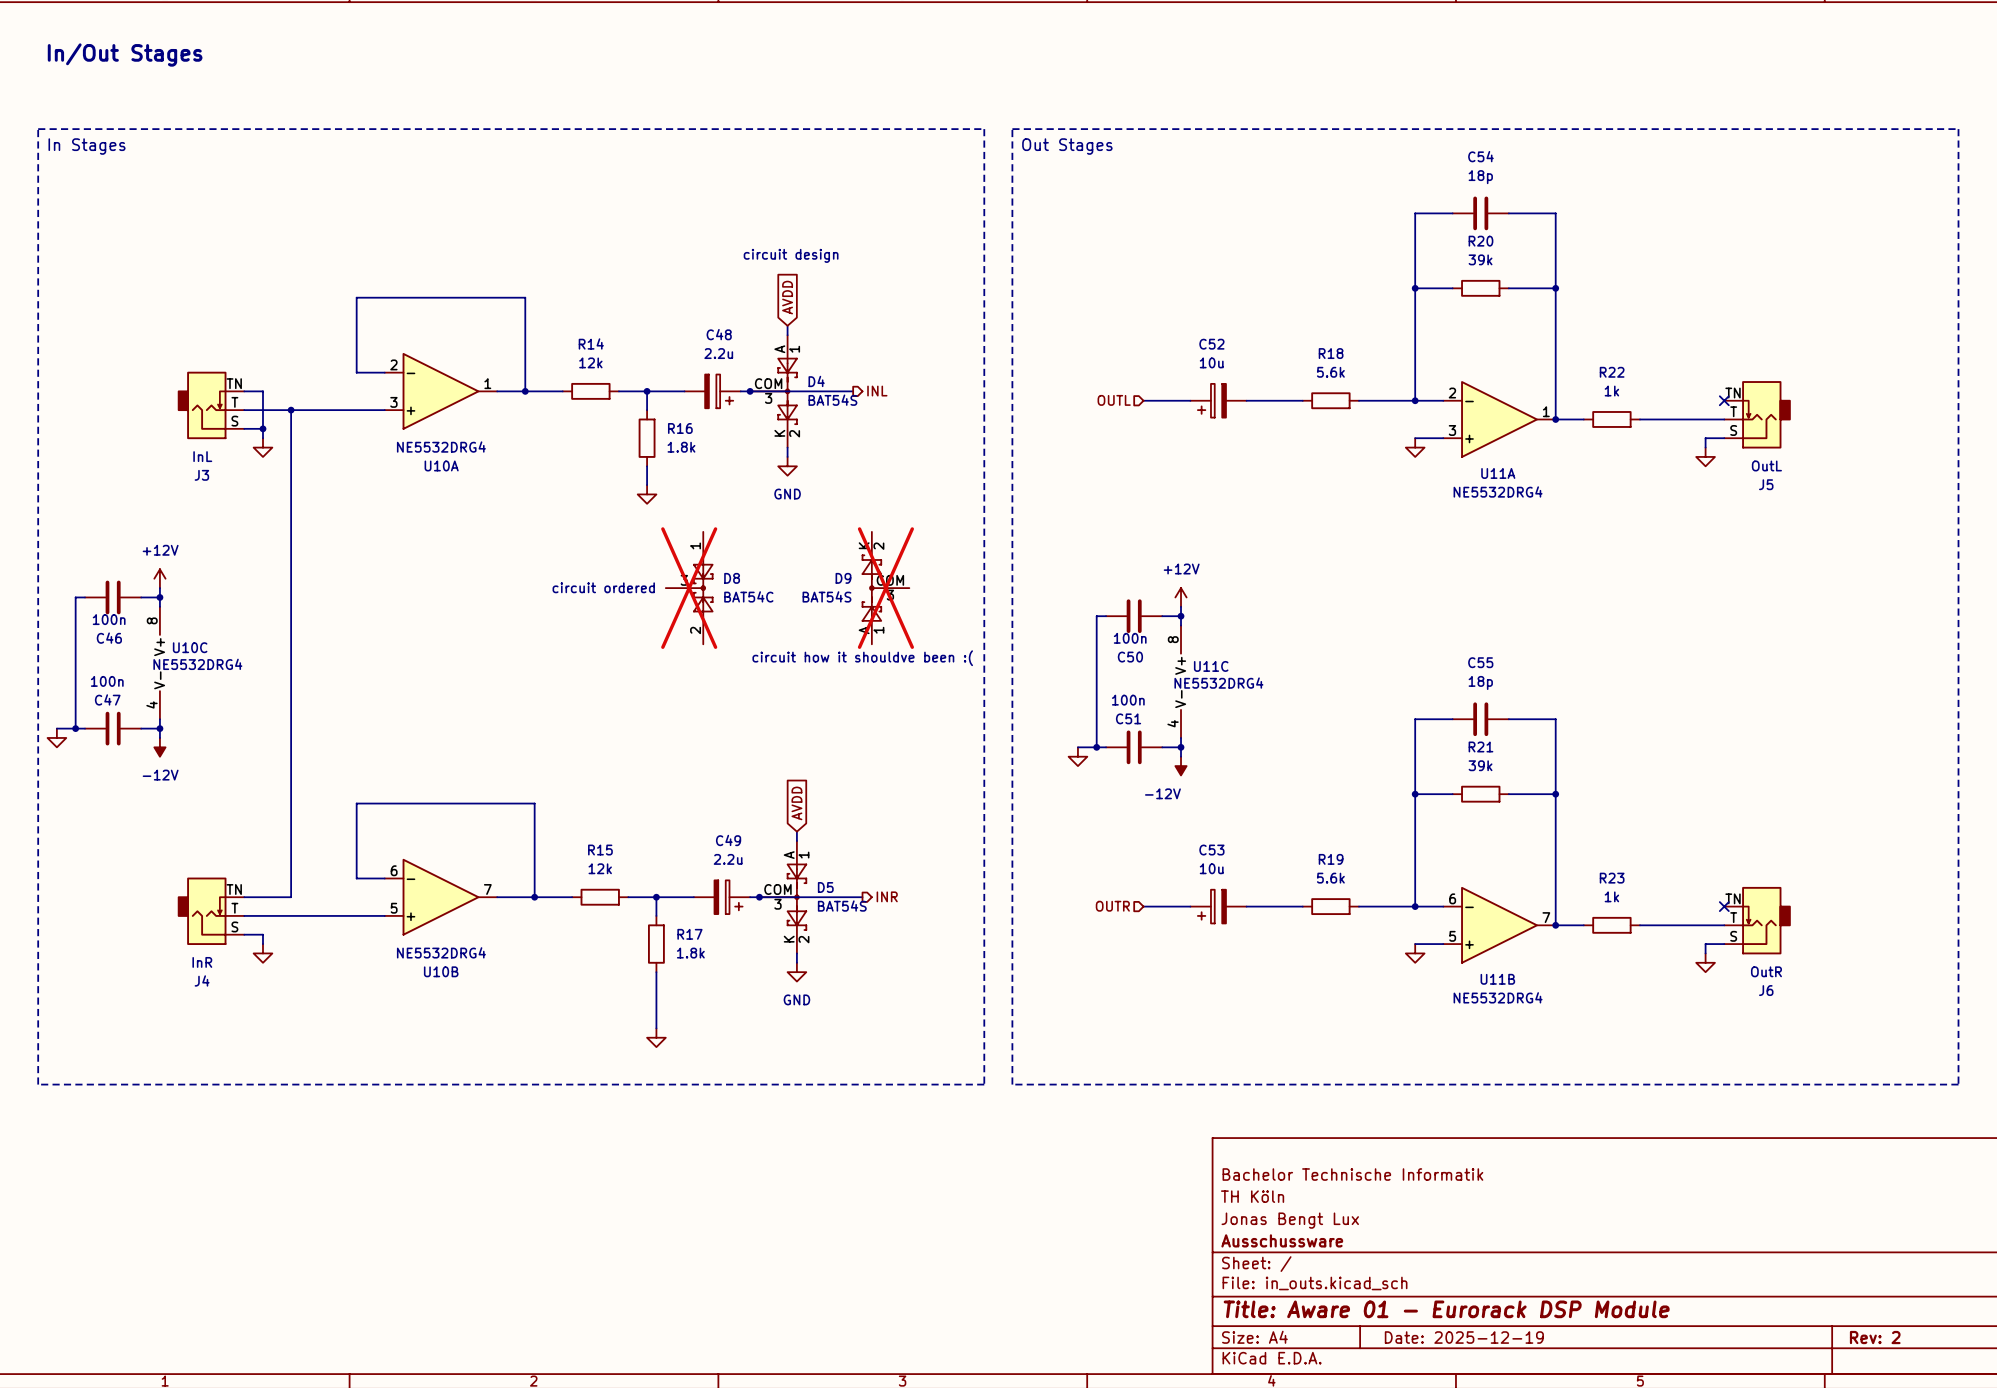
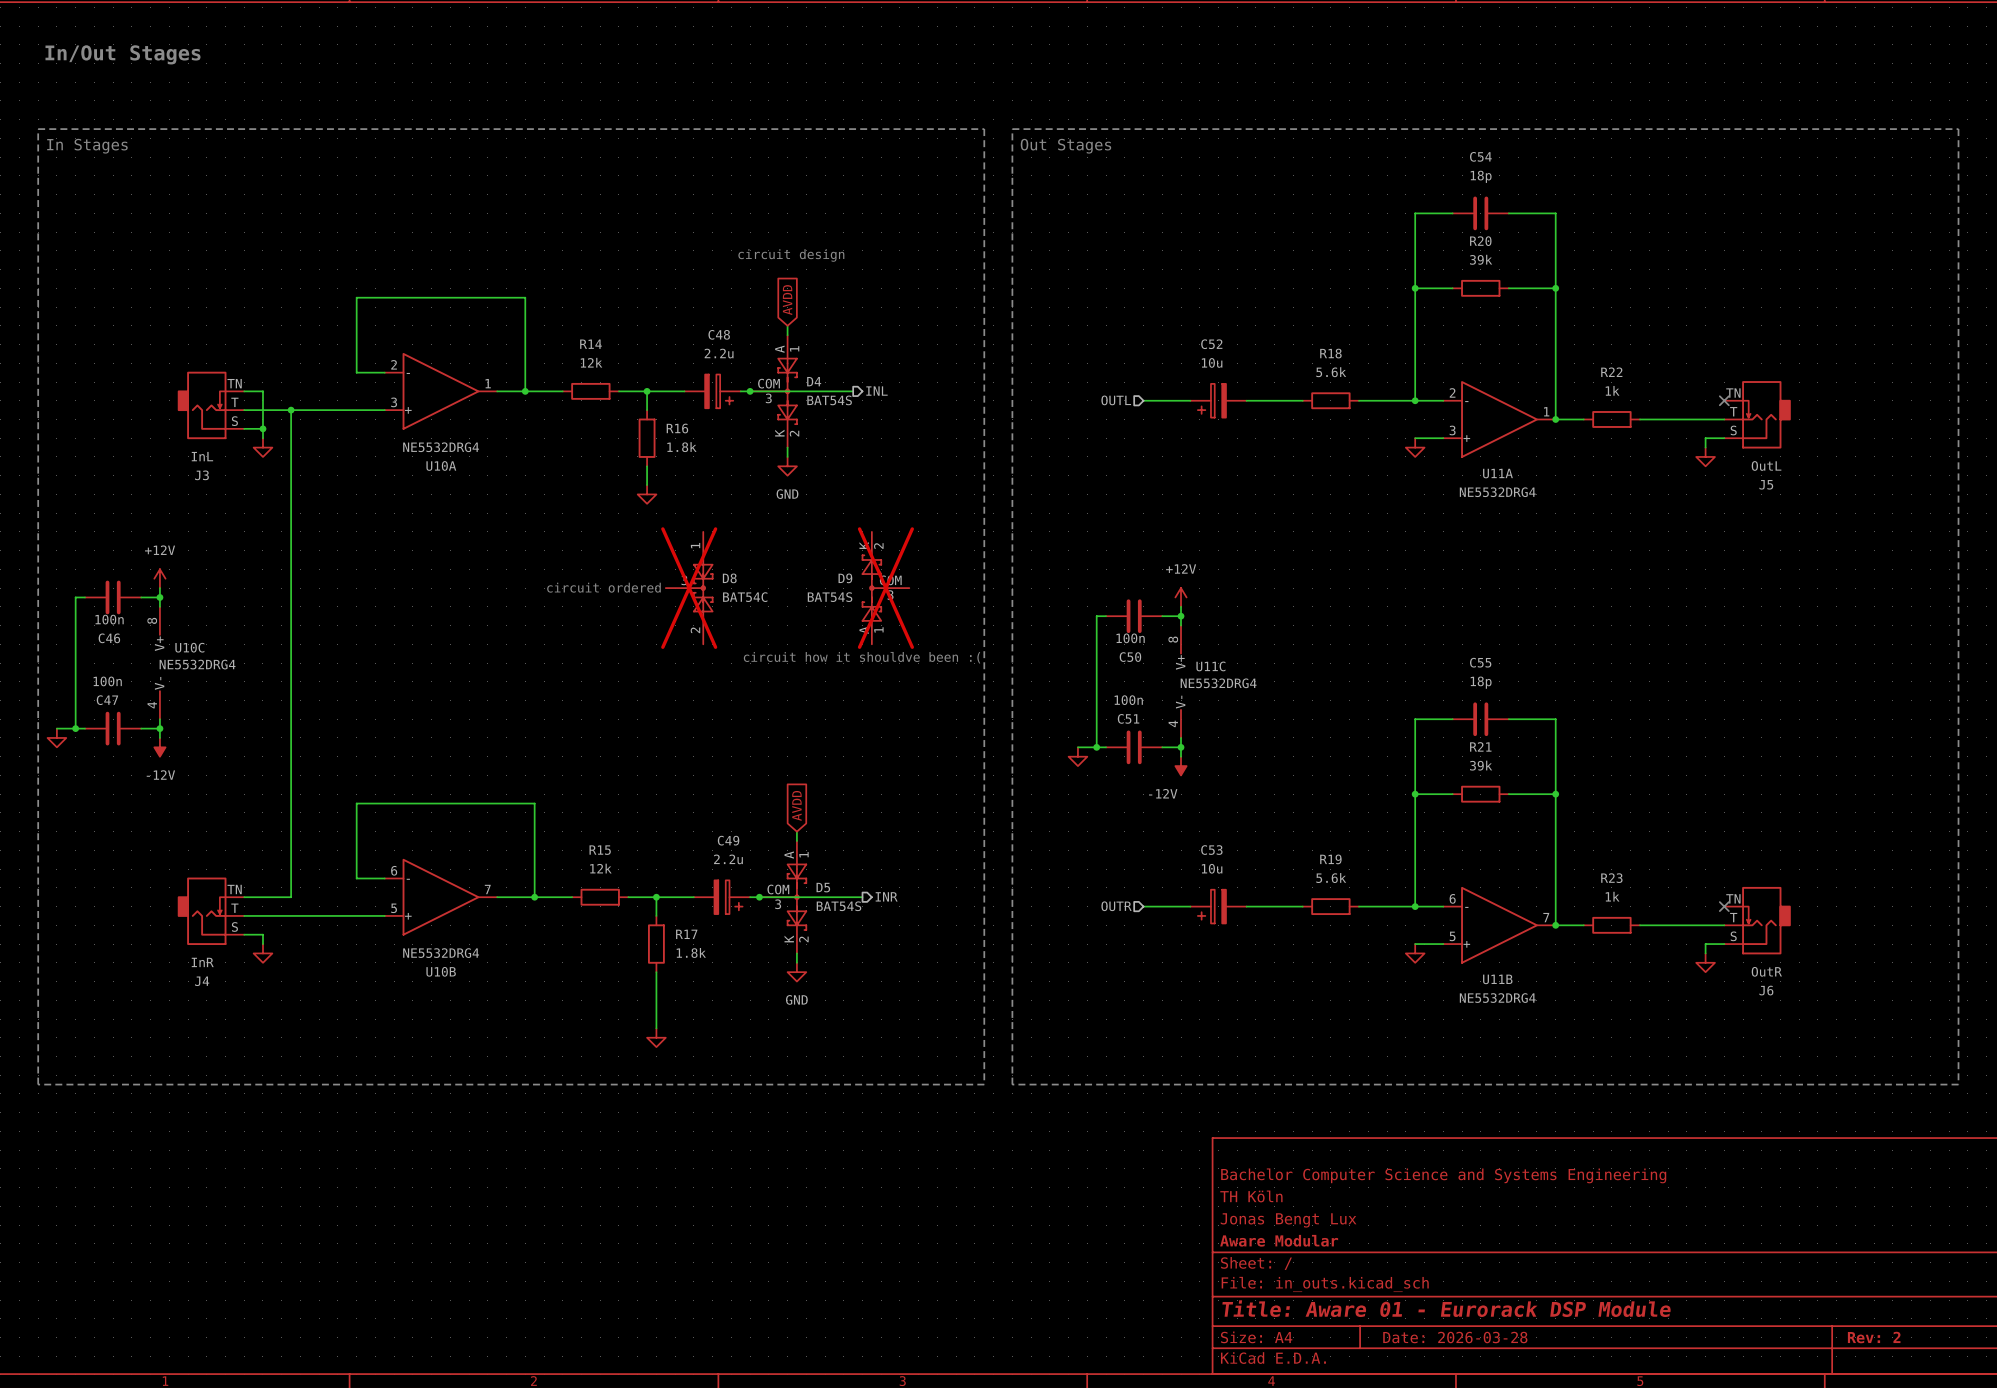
title block: Bachelor Technische Informatik (1352, 1174) -> Bachelor Computer Science and Systems Engineering (1443, 1175)
title block: Ausschussware (1282, 1240) -> Aware Modular (1279, 1240)
title block: Date: 2025-12-19 (1464, 1337) -> Date: 2026-03-28 (1455, 1337)

